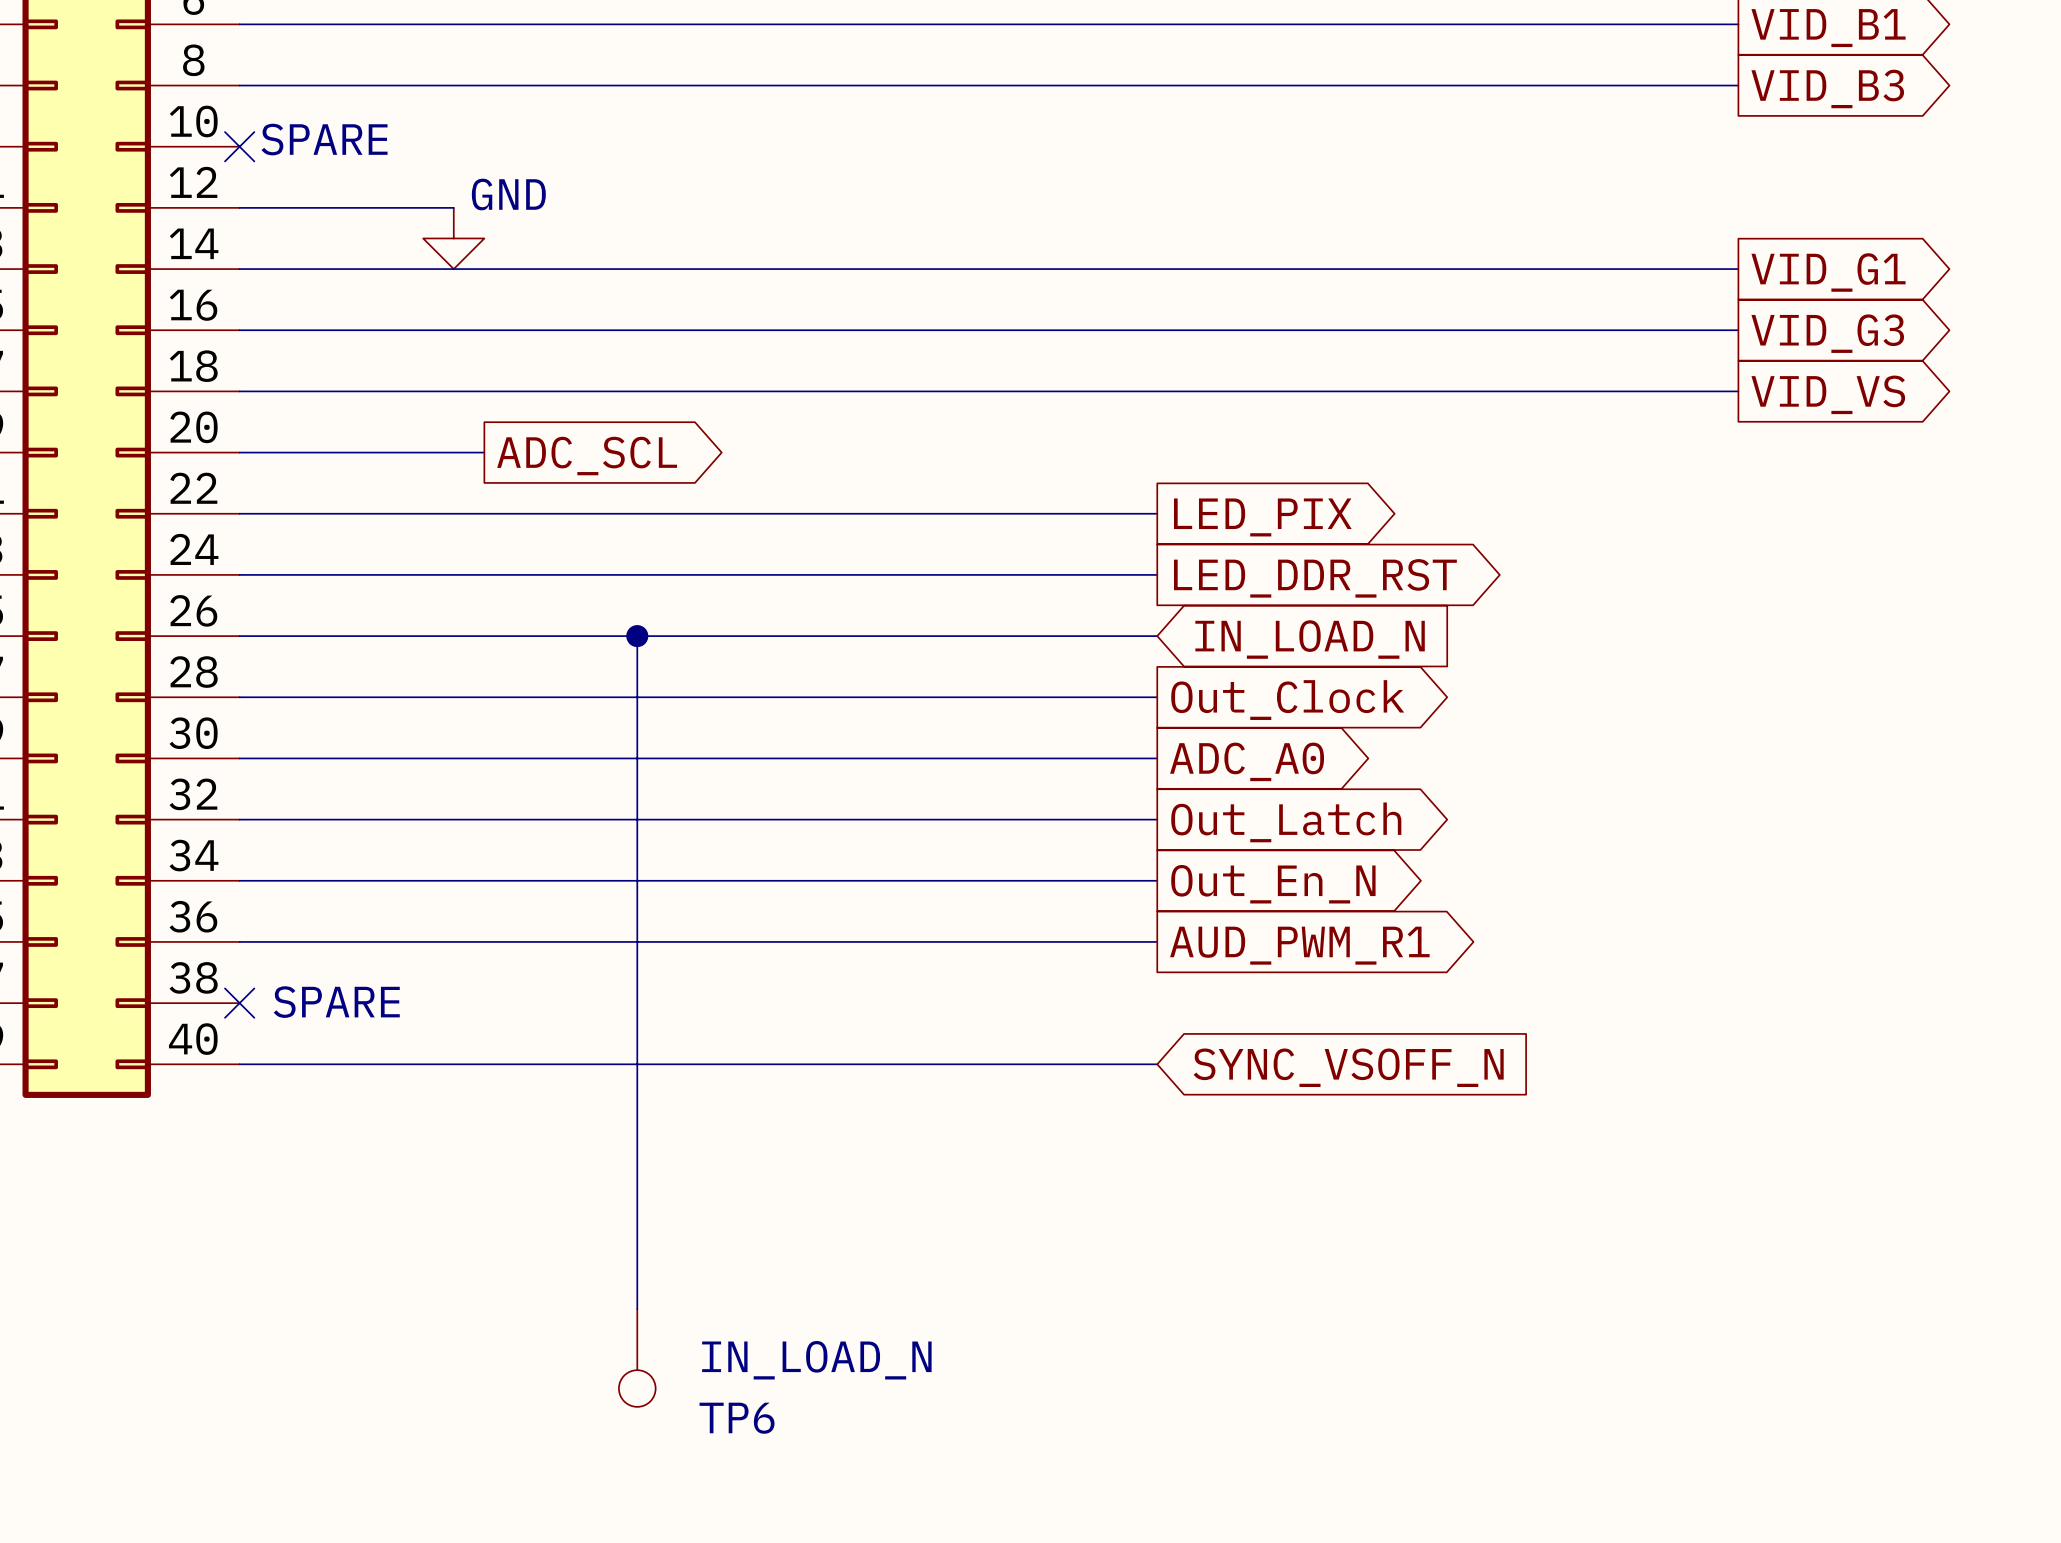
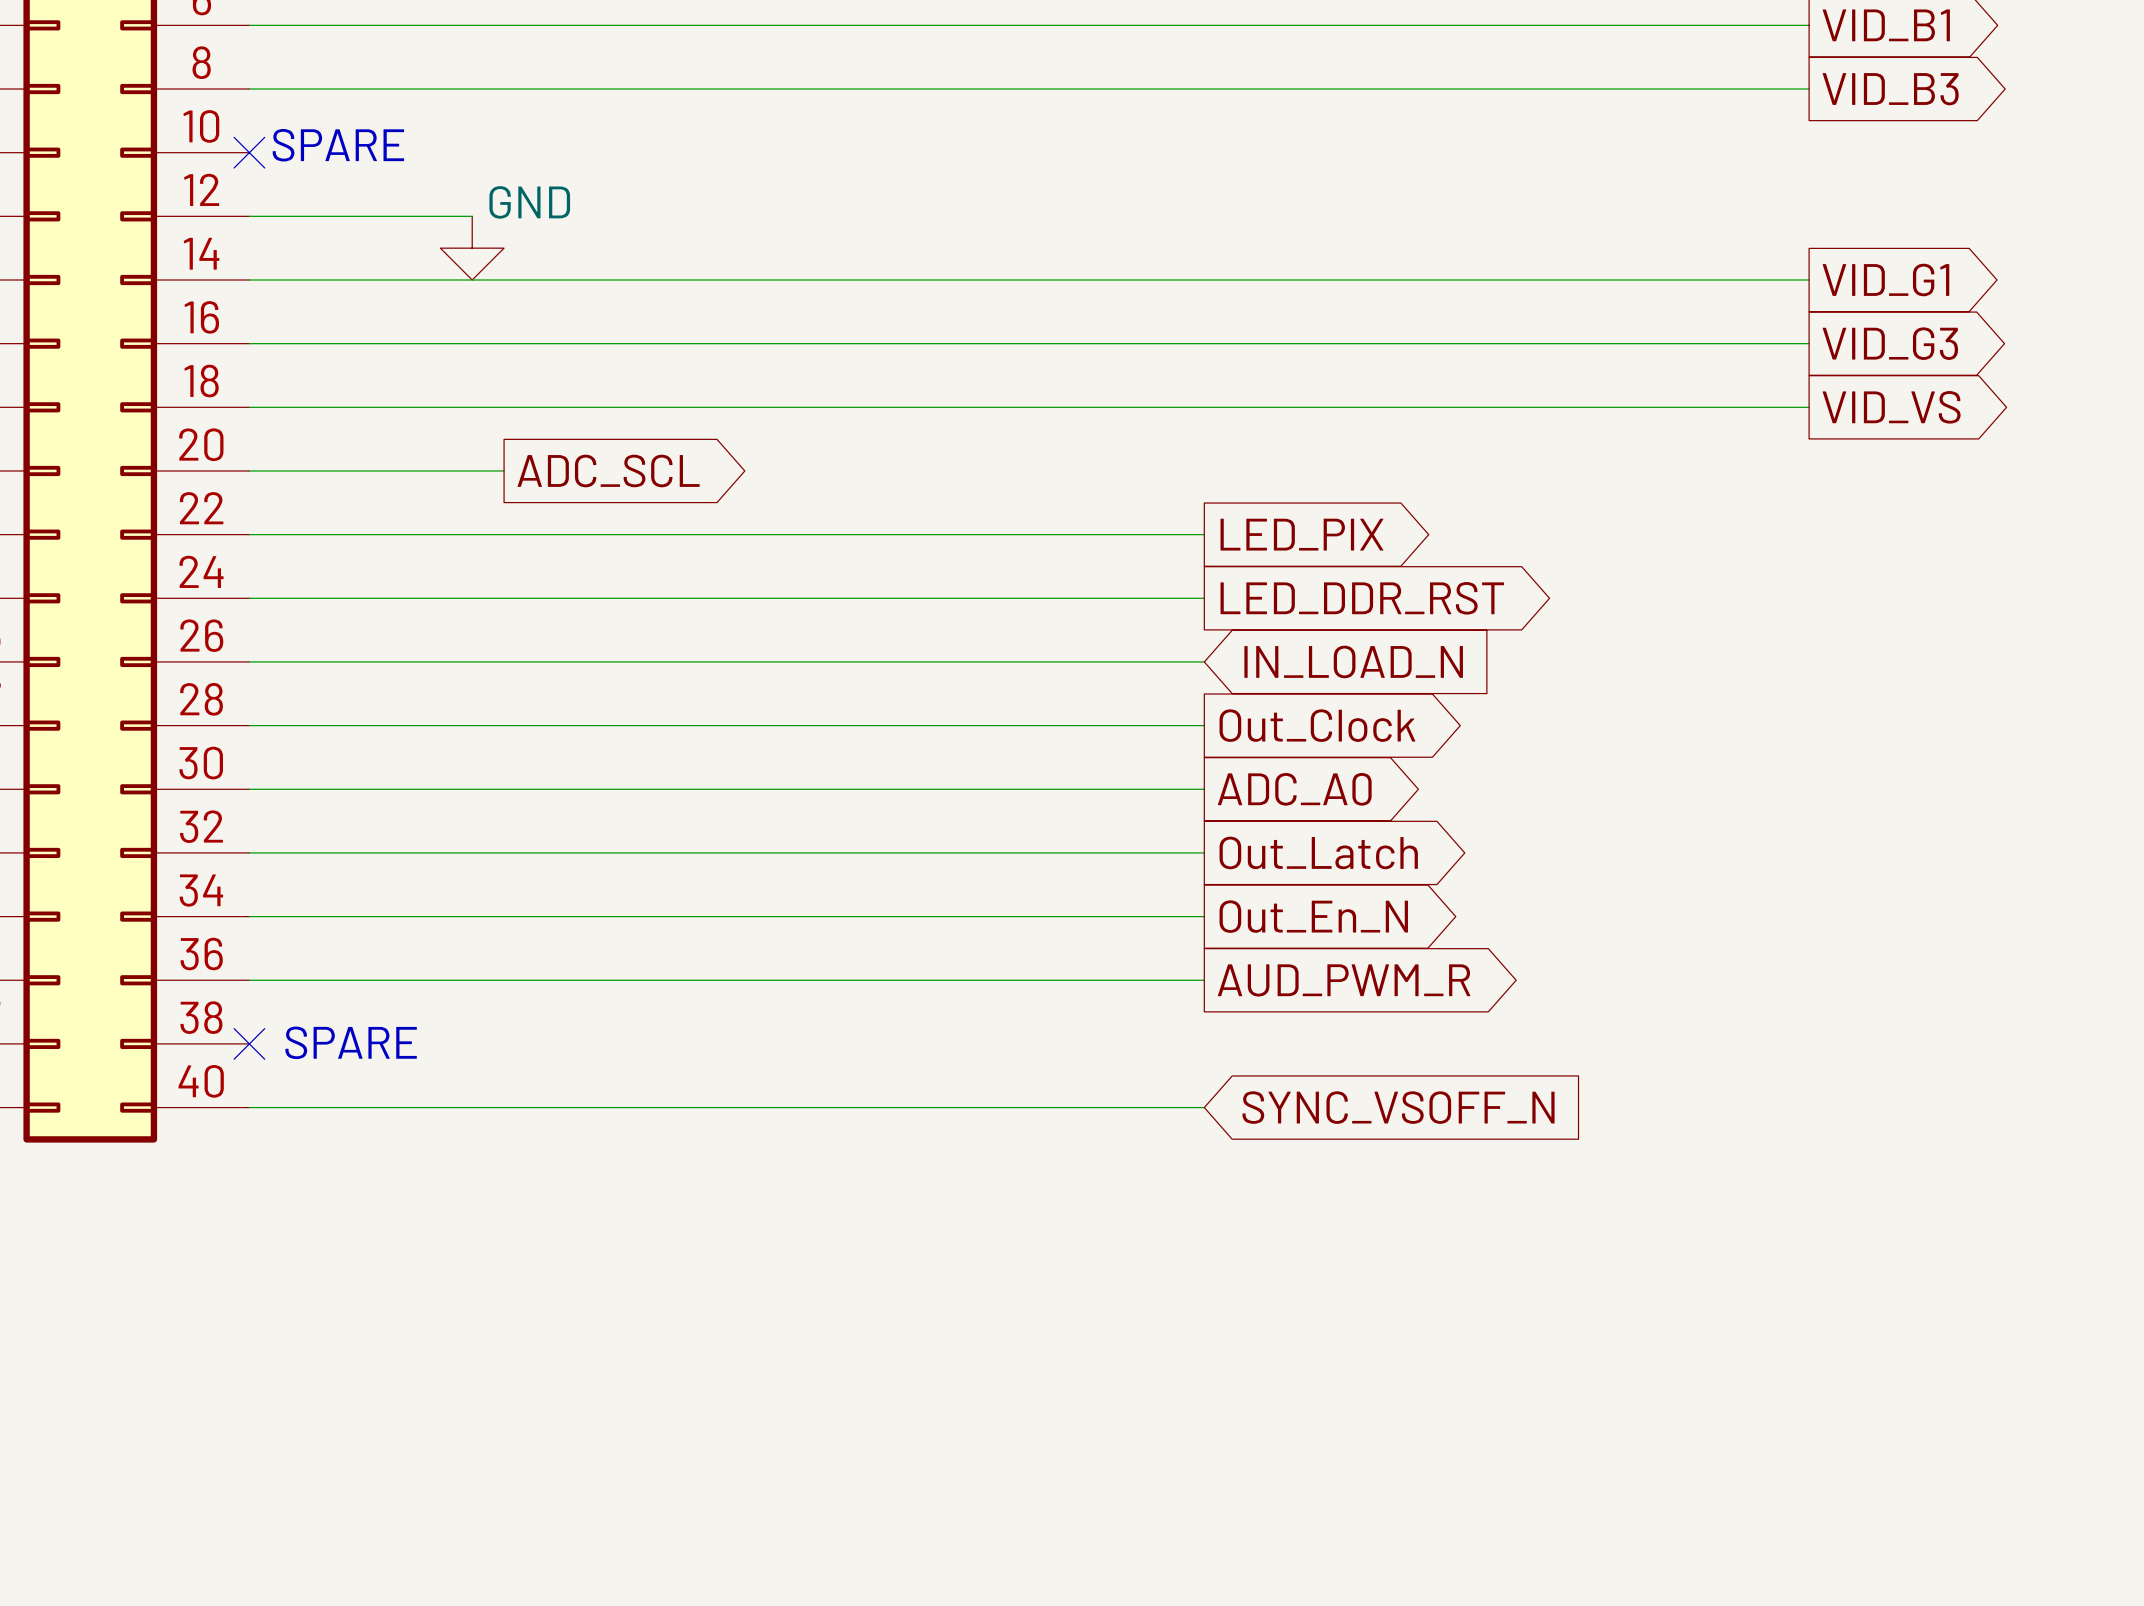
wire: (637, 636) (637, 1309) -> none
junction: (637, 636) -> none
global label: AUD_PWM_R1 (1299, 945) -> AUD_PWM_R (1344, 980)
TP6: IN_LOAD_N (637, 1357) -> none

